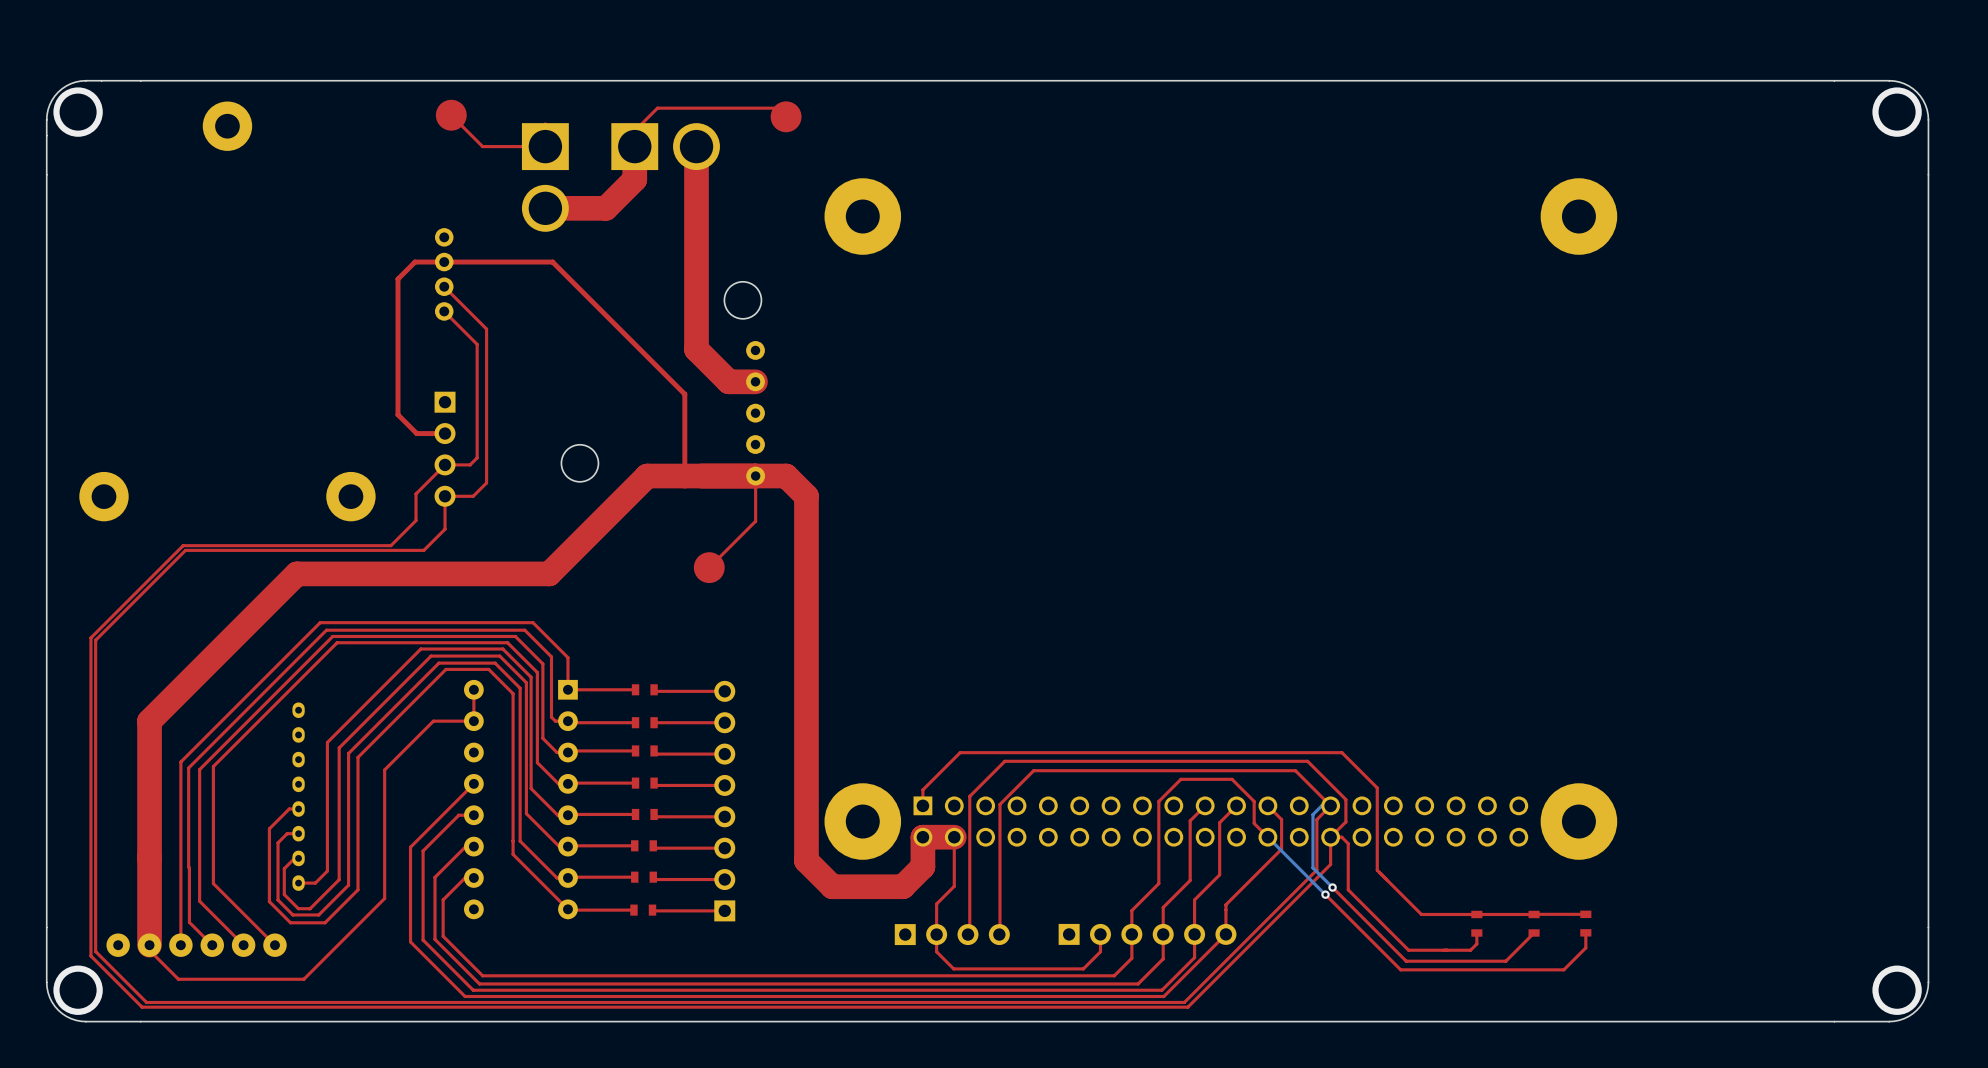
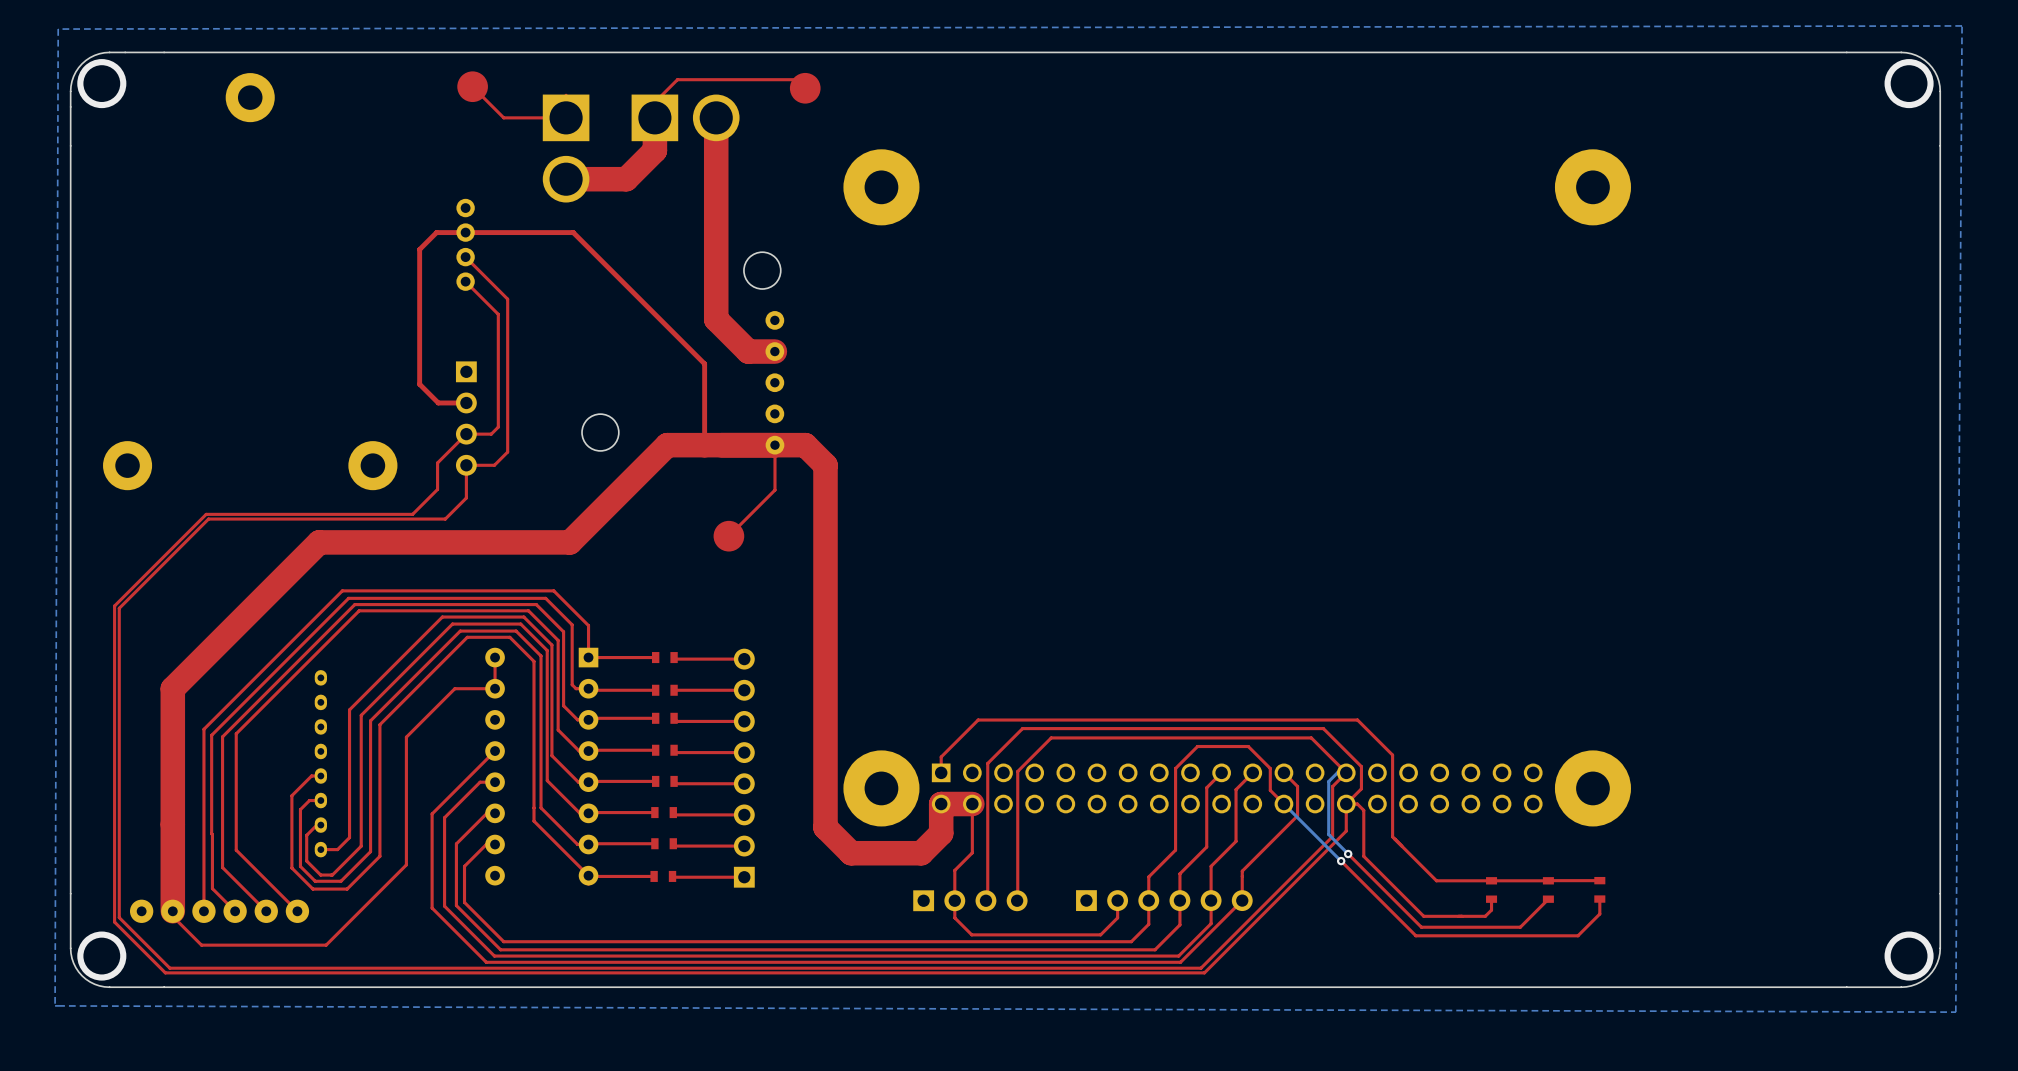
bottom zone outline: none -> (1962, 25) (1955, 1012) (55, 1005) (58, 29) (1962, 25)

